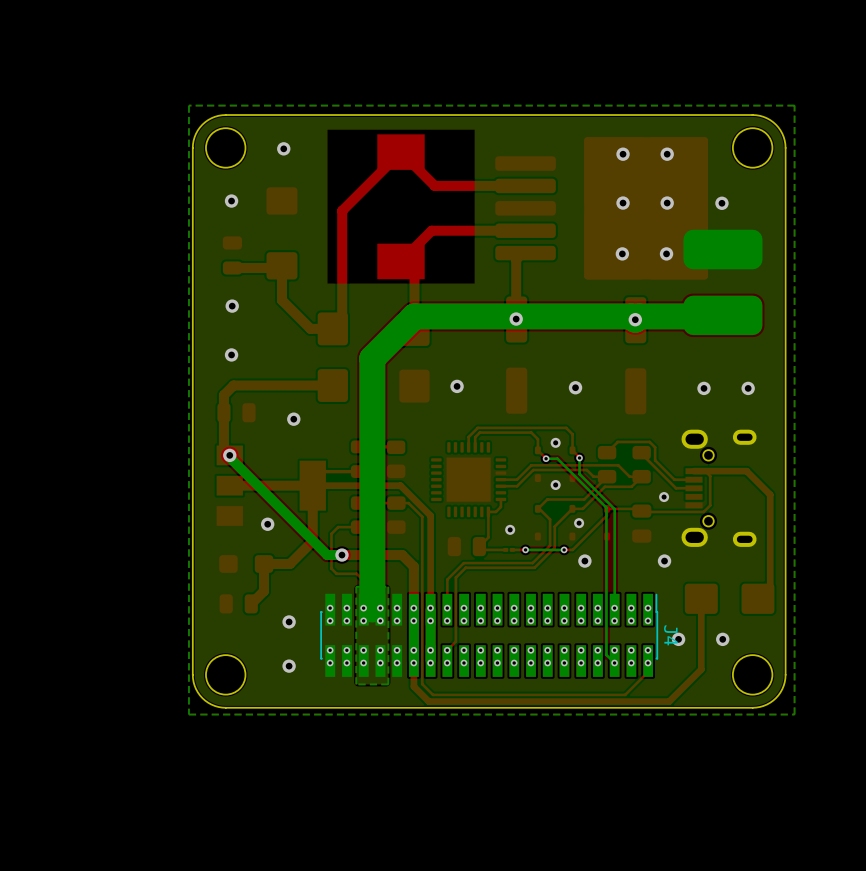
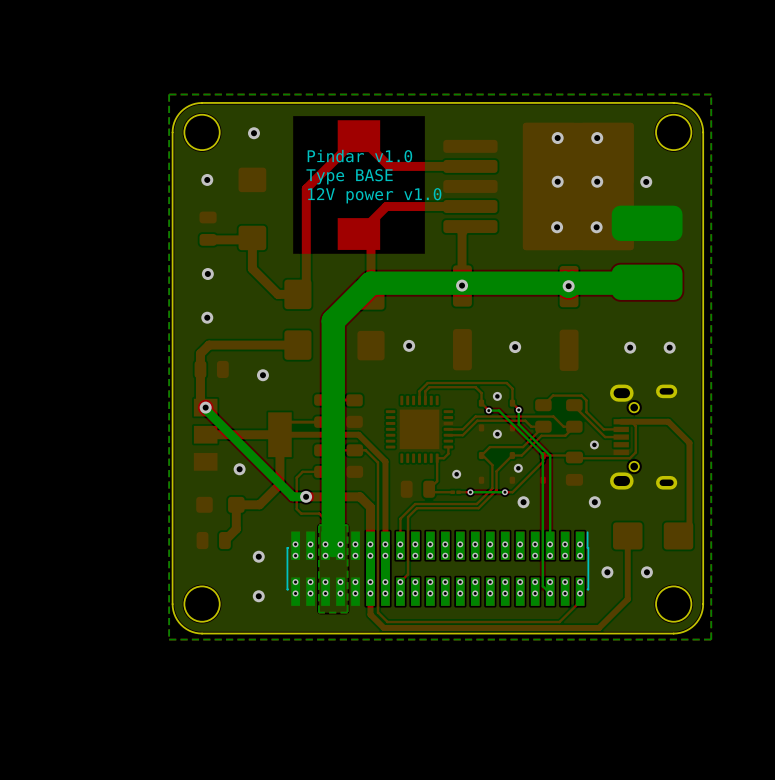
text: none -> Pindar v1.0 (359, 156)
text: none -> Type BASE (349, 176)
text: none -> 12V power v1.0 (374, 195)
J4 name: J4 (670, 635) -> none

